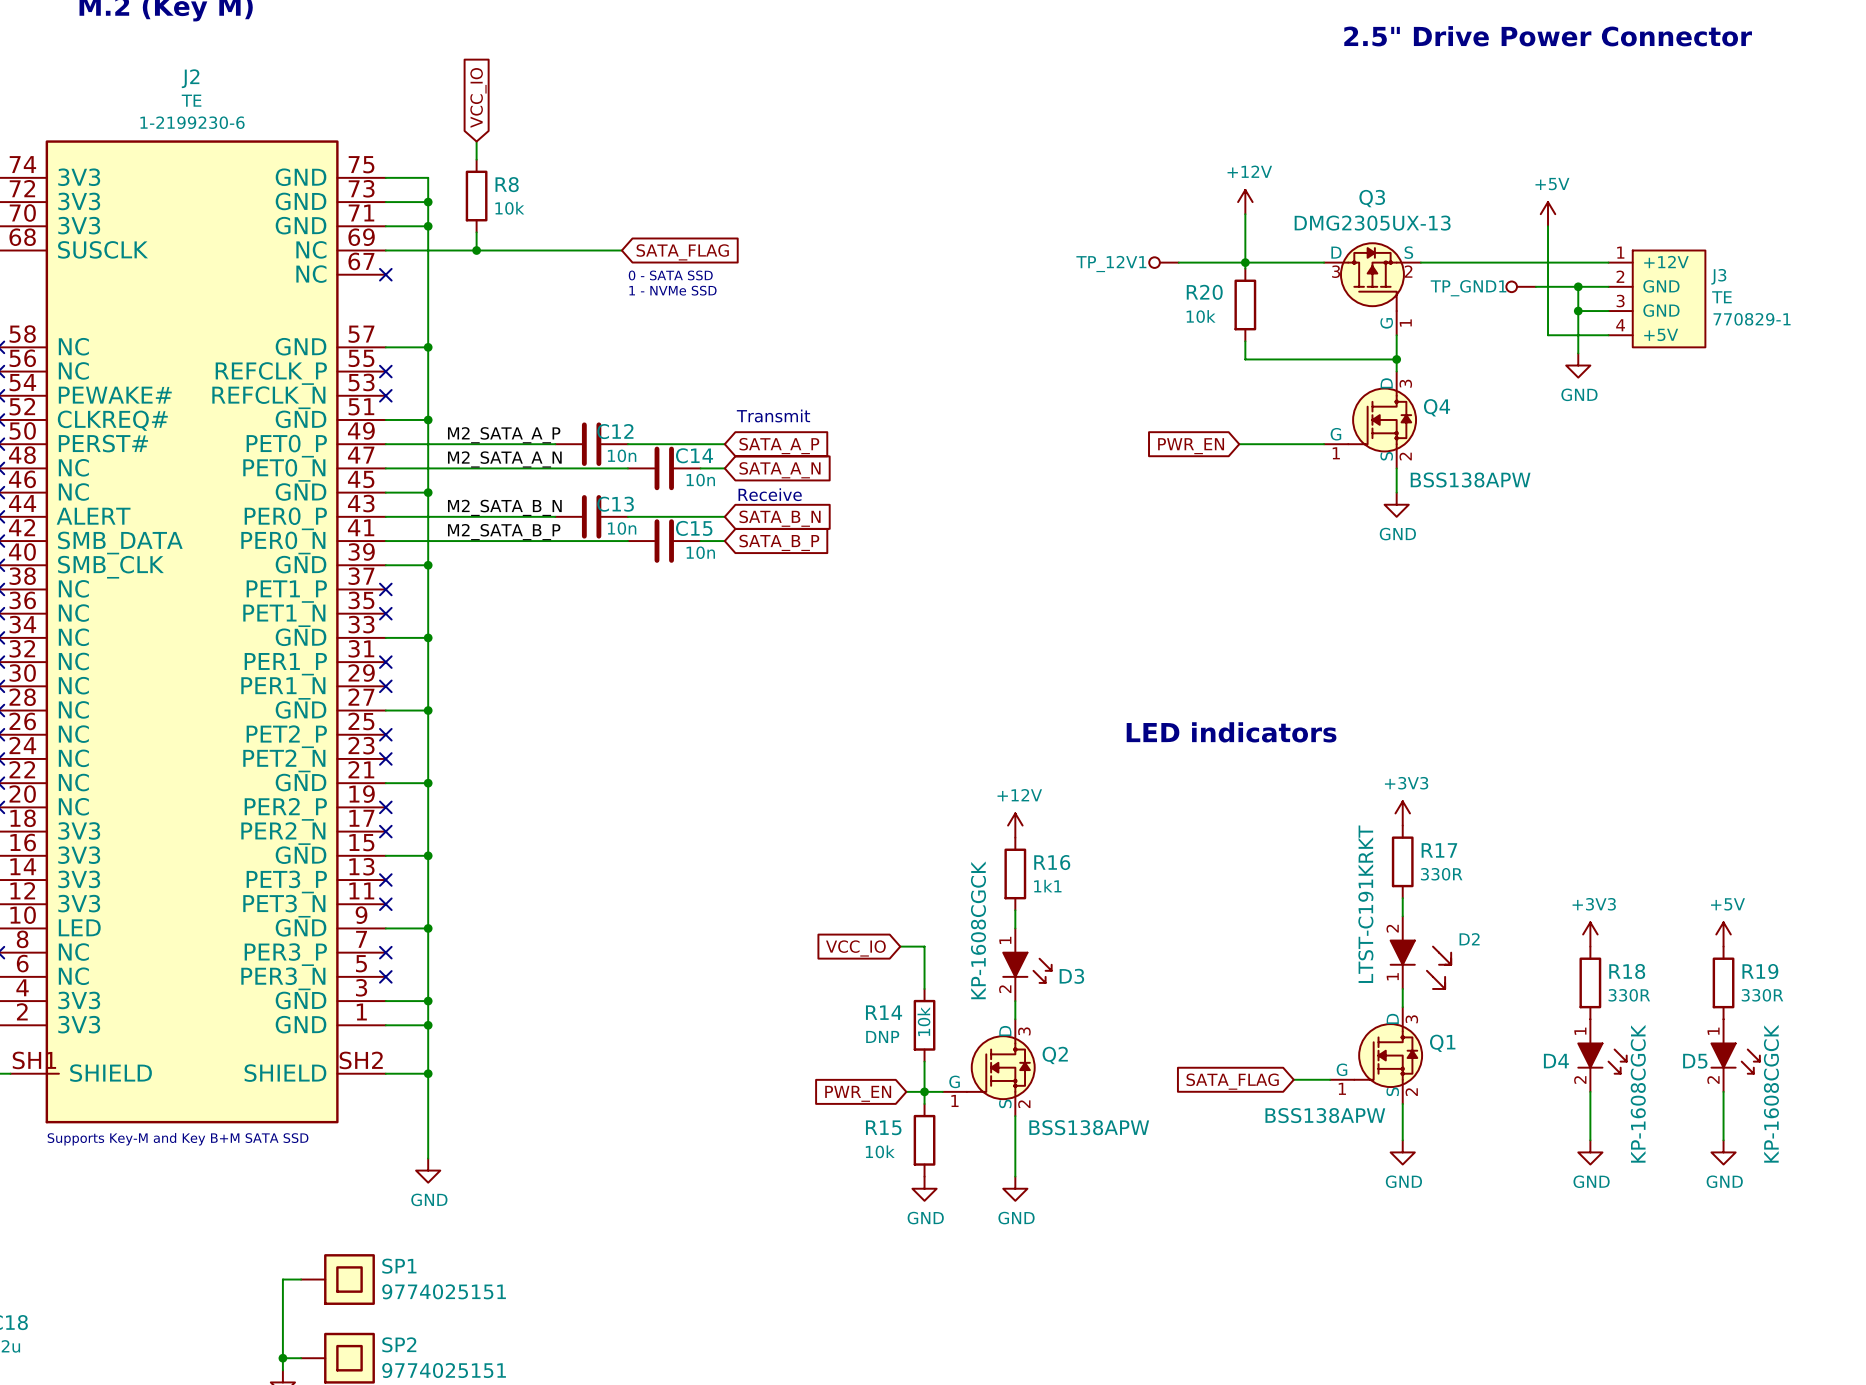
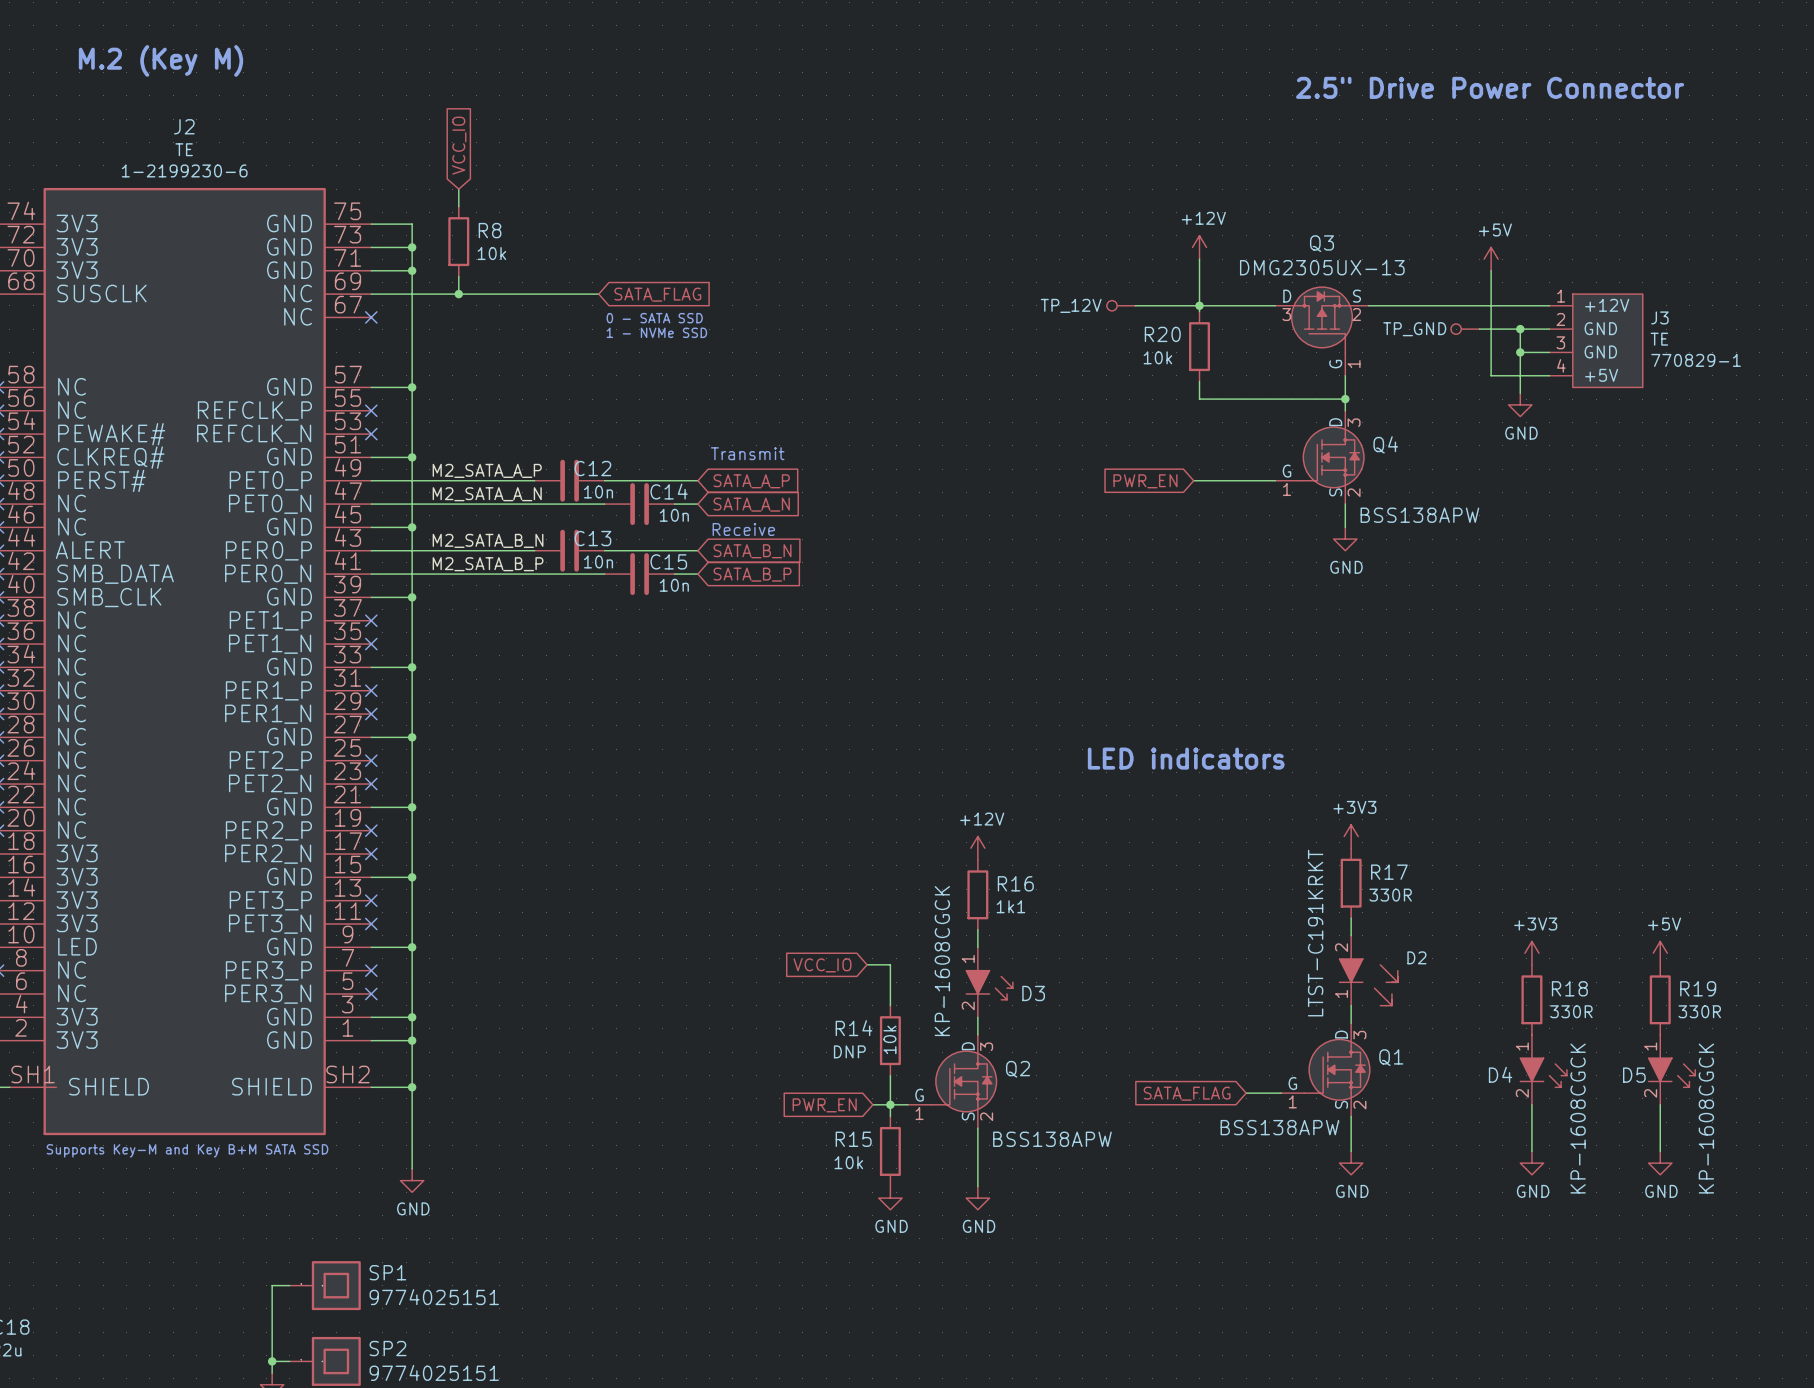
TP_12V1 name: TP_12V1 (1111, 264) -> TP_12V (1071, 305)
TP_GND1 name: TP_GND1 (1468, 288) -> TP_GND (1414, 329)

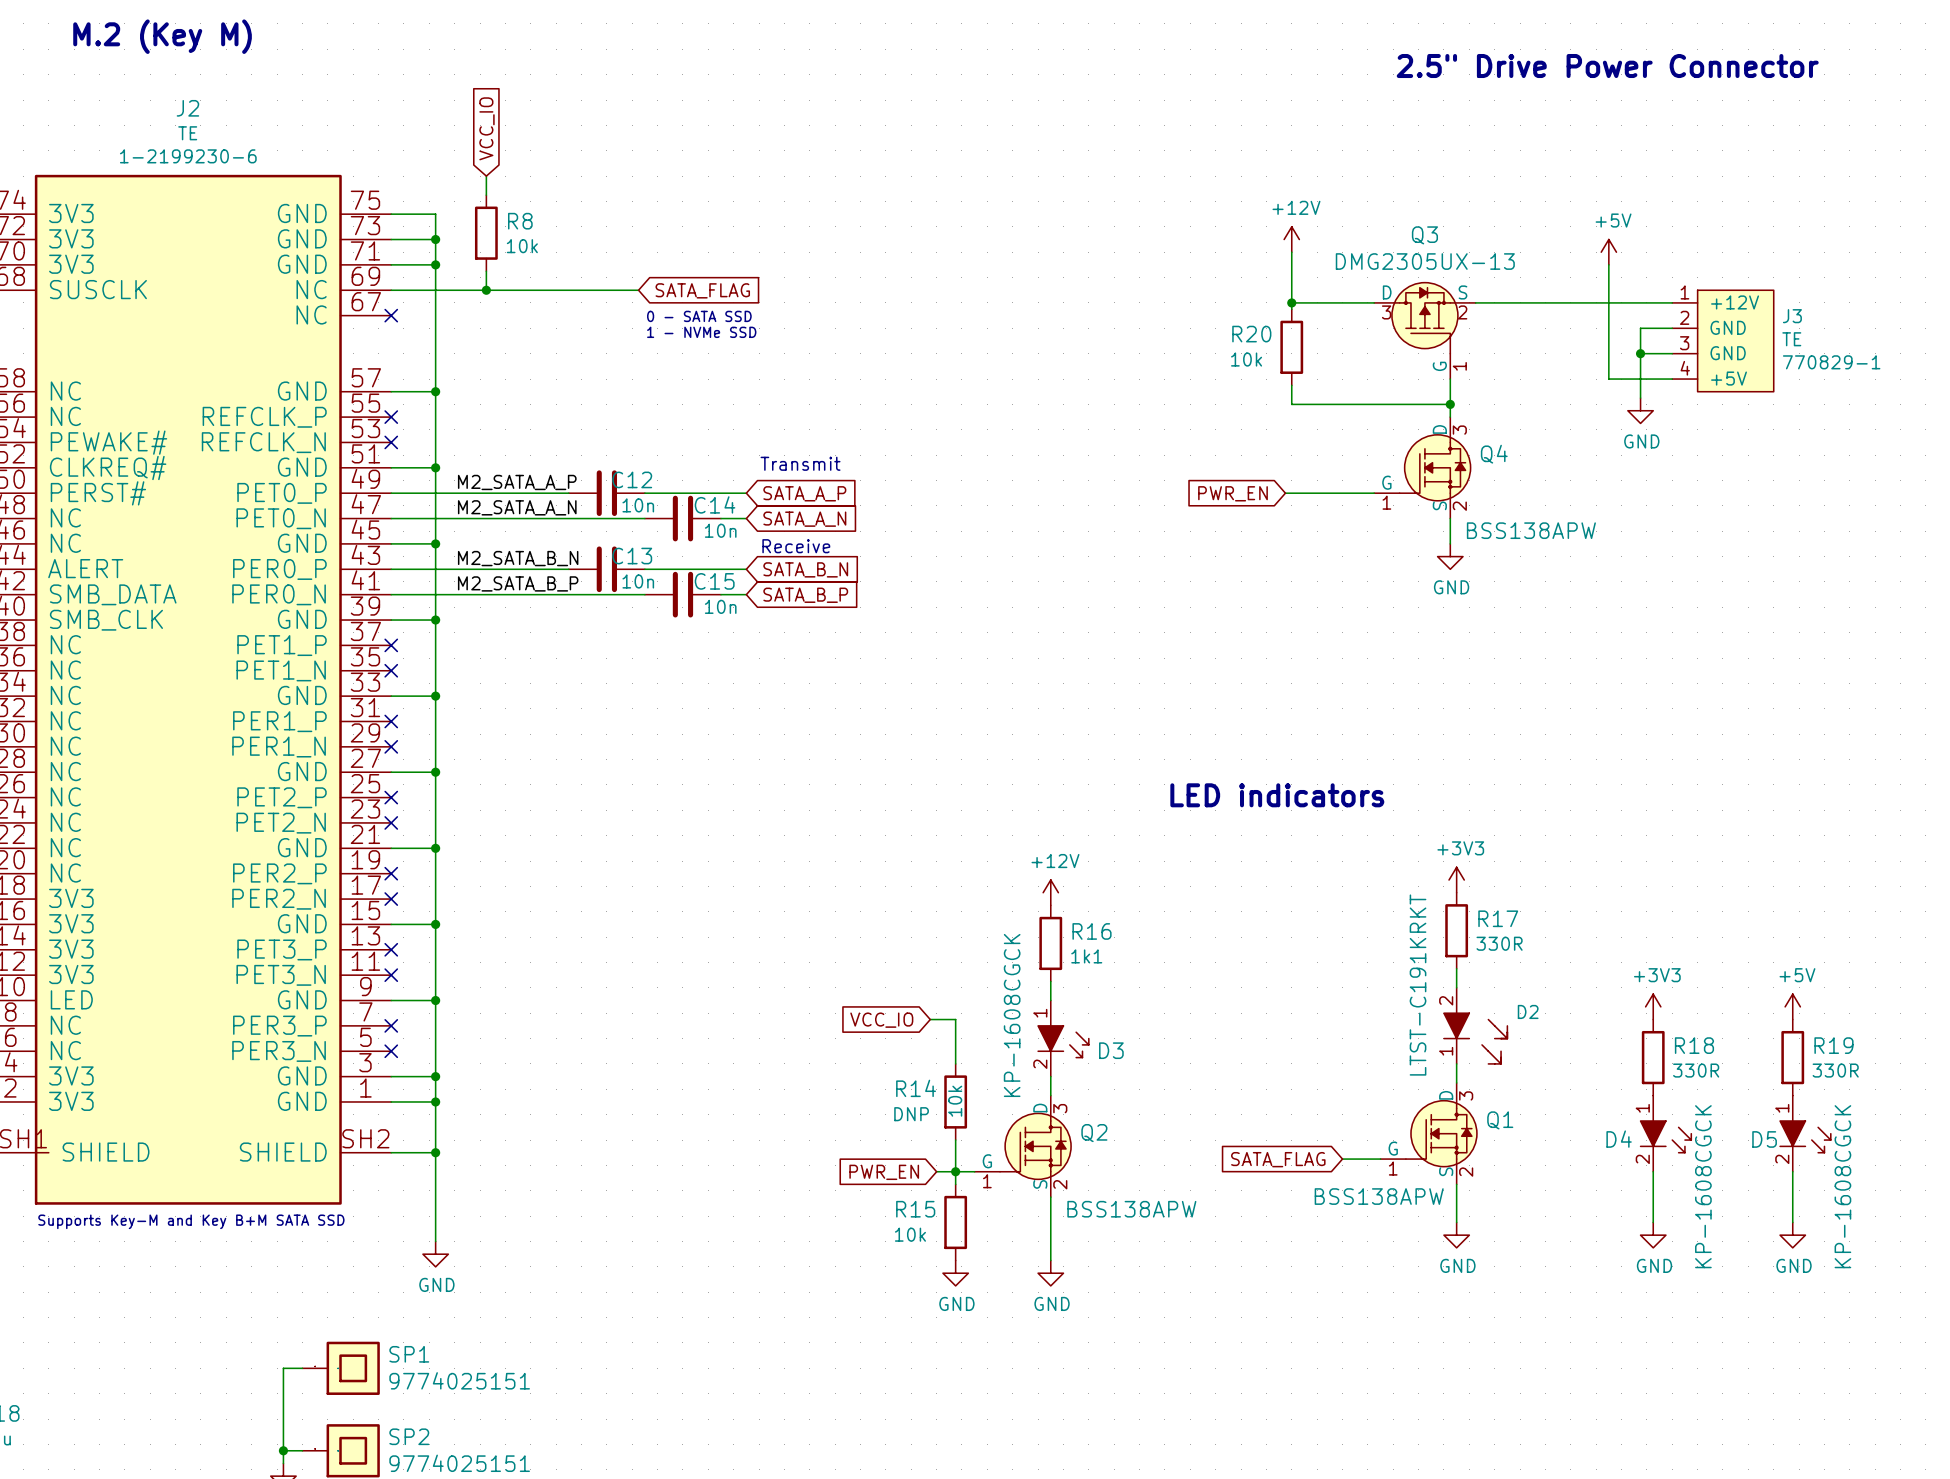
TP_12V: (1121, 305) -> none
wire: (1135, 305) (1199, 305) -> none
TP_GND: (1465, 329) -> none
wire: (1479, 329) (1520, 329) -> none
junction: (1520, 329) -> none

